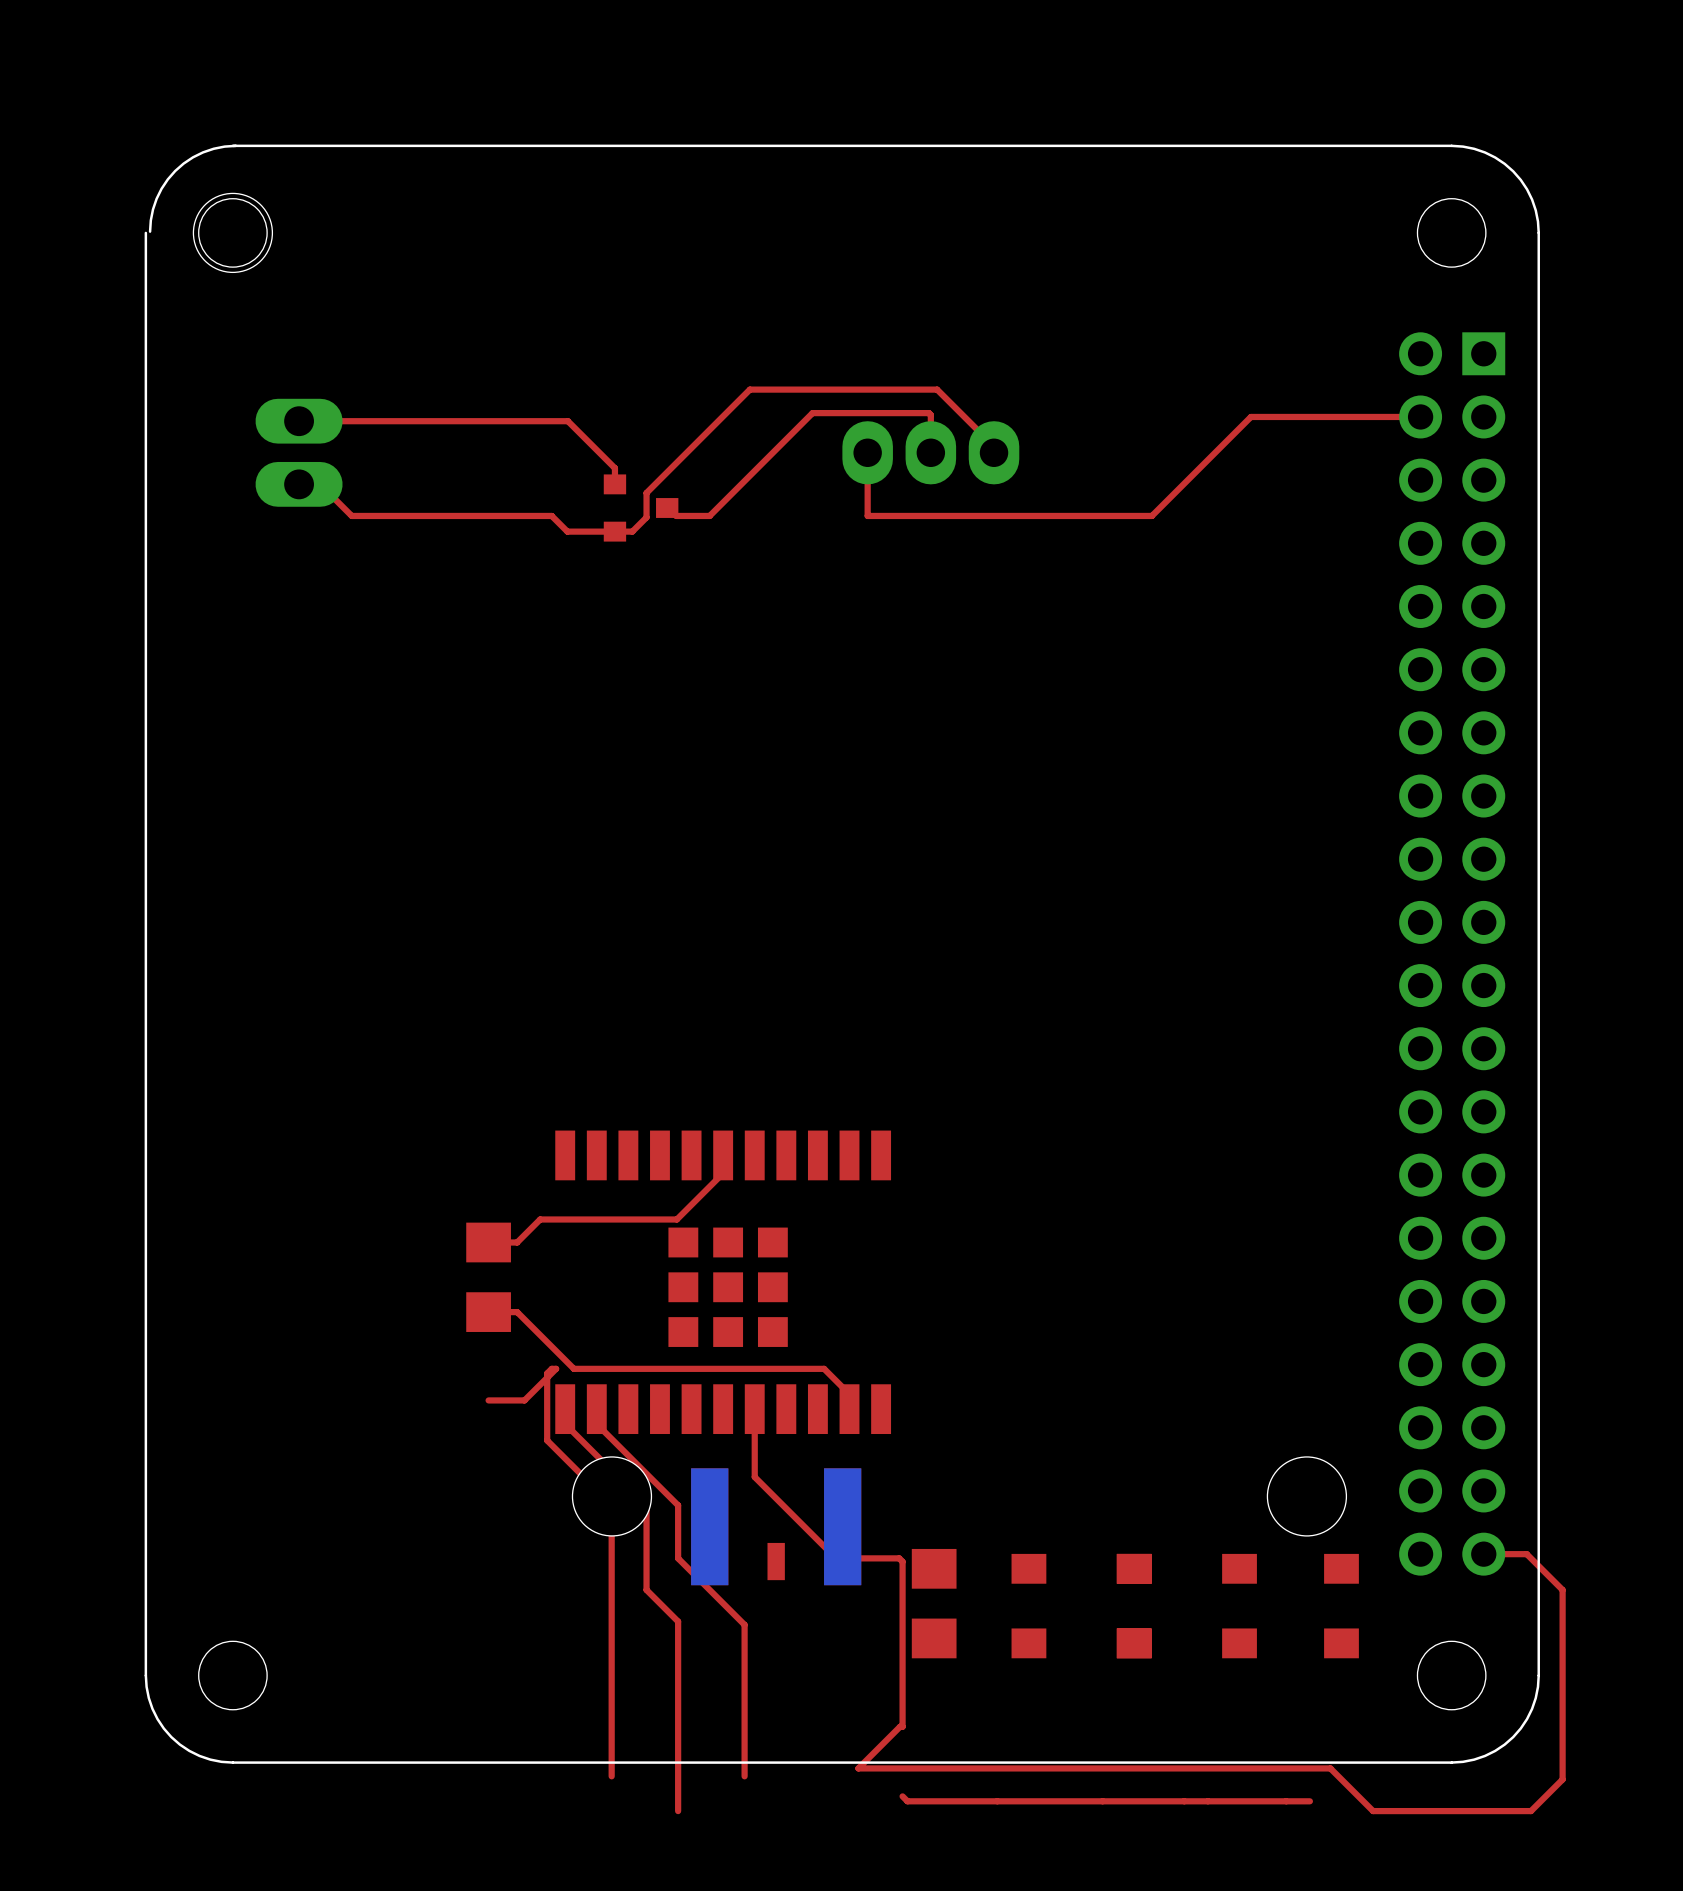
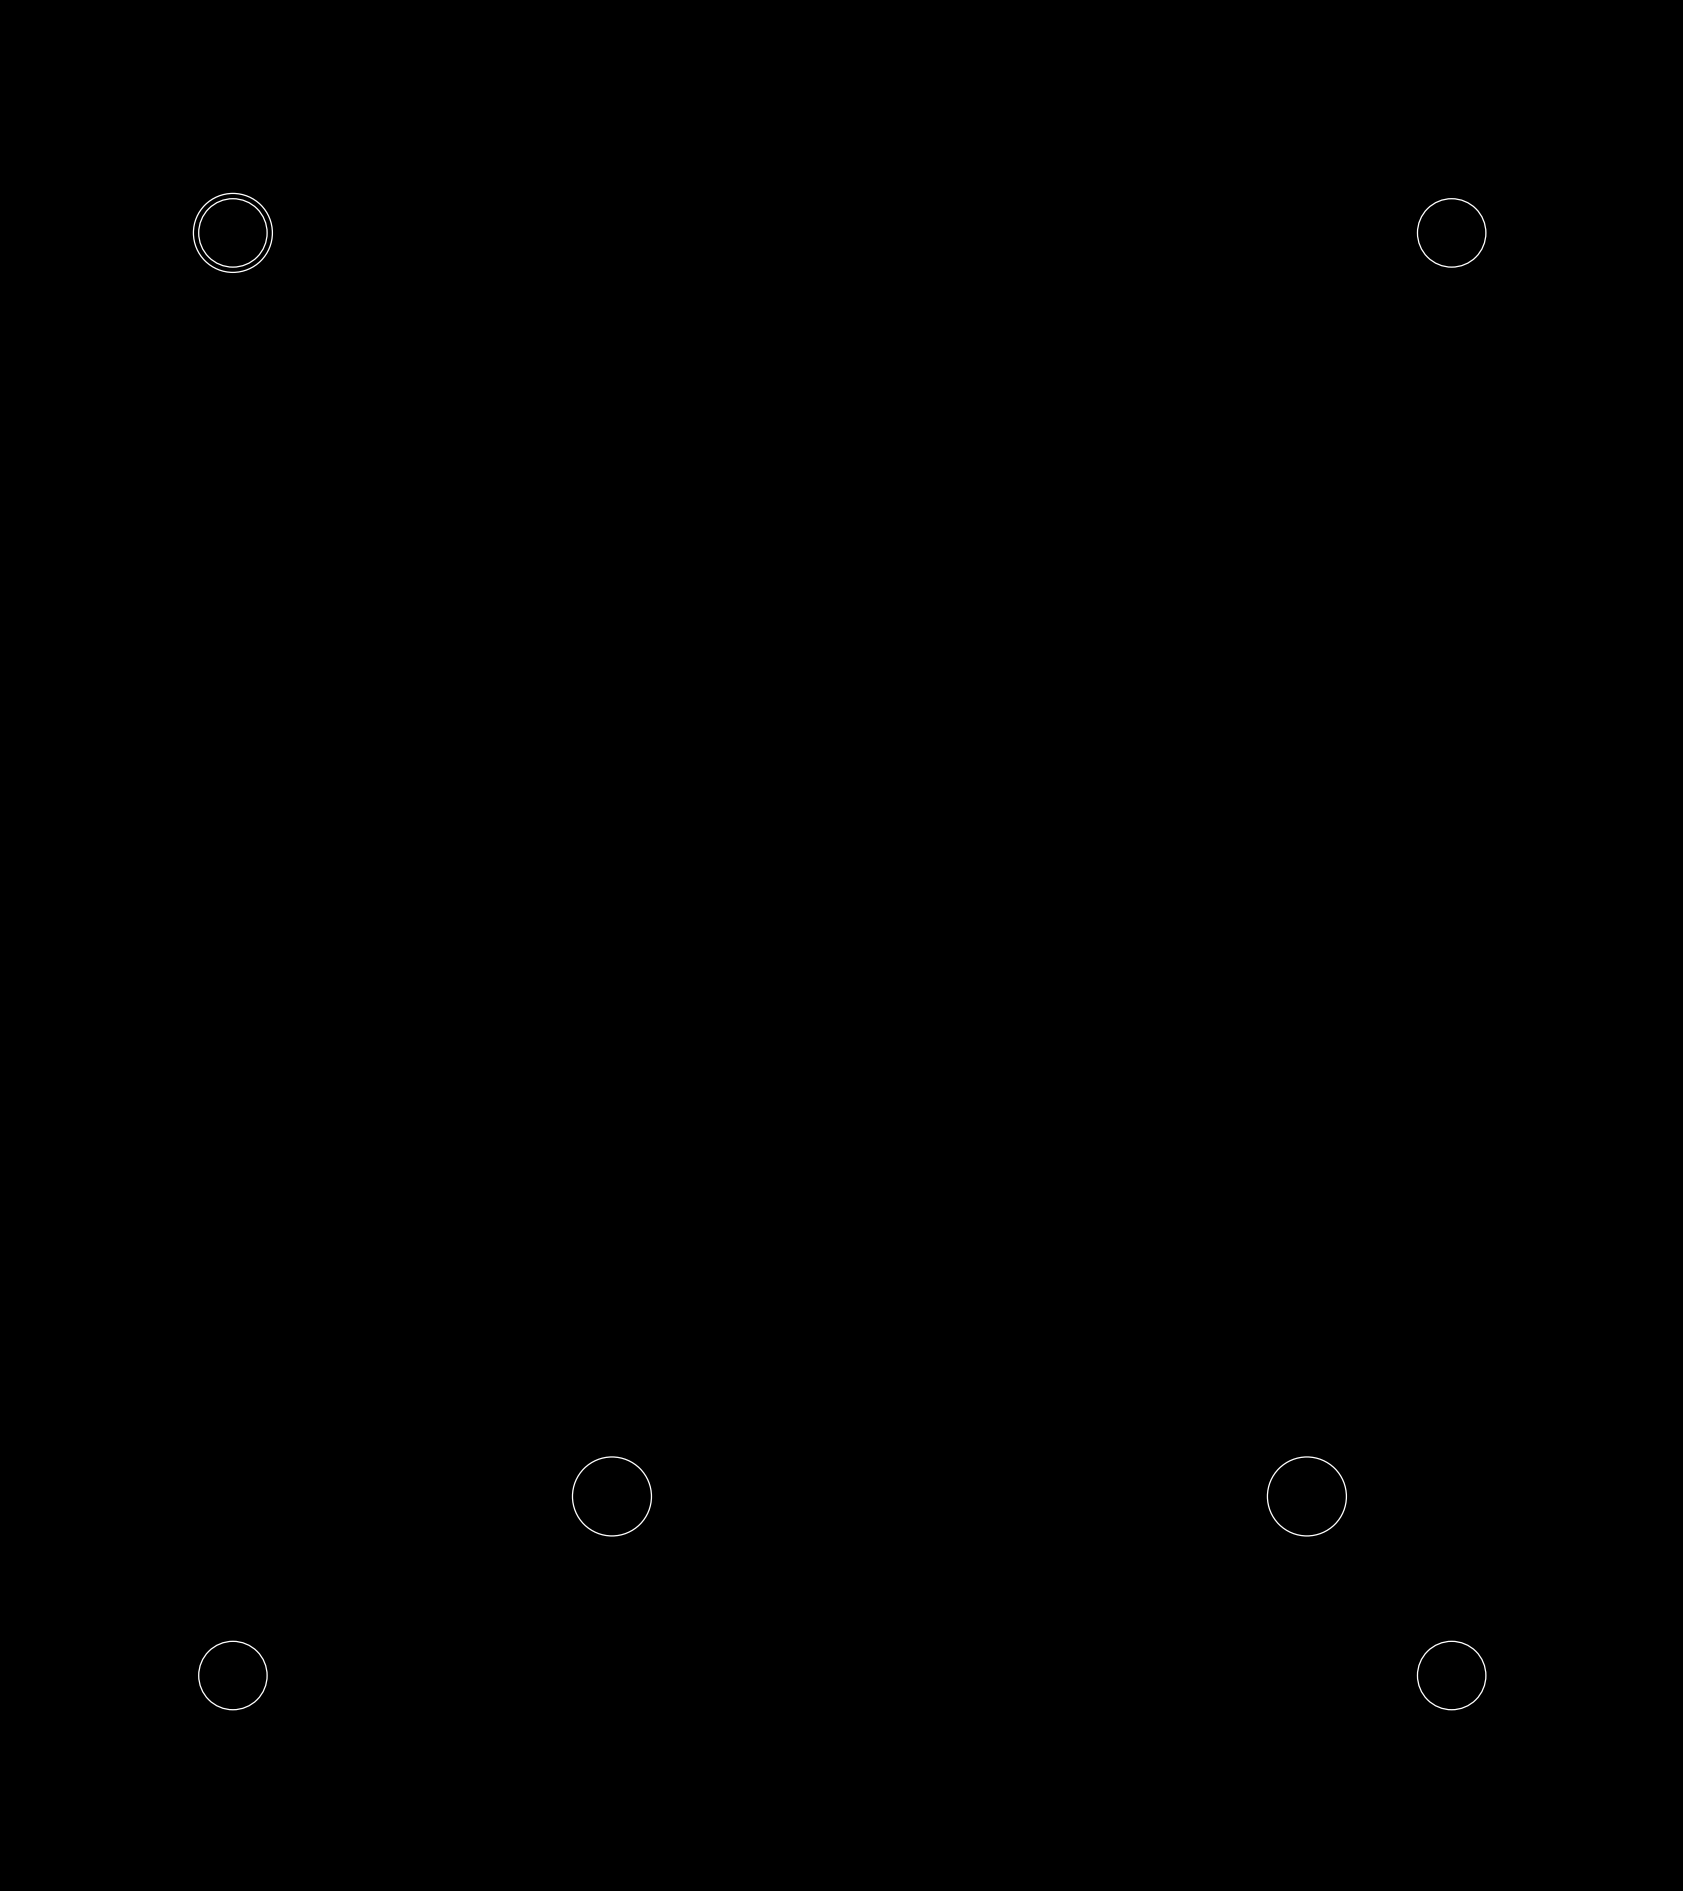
board edge: (232, 145) (1451, 145) (1474, 148) (1495, 157) (1520, 179) (1532, 199) (1538, 232) (1538, 1675) (1532, 1708) (1513, 1737) (1484, 1755) (1451, 1762) (232, 1762) (199, 1755) (171, 1737) (152, 1708) (145, 1675) (145, 232) -> none
board edge: (235, 145) (203, 152) (175, 170) (156, 198) (150, 231) -> none
top track: (1420, 416) (1250, 416) (1151, 515) (867, 515) (867, 452) -> none
top track: (299, 421) (567, 421) (614, 468) (614, 484) -> none
part: (299, 452) -> none
top track: (930, 452) (930, 414) (928, 413) (812, 413) (709, 515) (676, 515) (667, 508) -> none
part: (930, 452) -> none
top track: (994, 452) (994, 446) (937, 389) (749, 389) (646, 492) (646, 517) (632, 531) (567, 531) (551, 515) (351, 515) (320, 484) (299, 484) -> none
part: (641, 508) -> none
part: (1452, 953) -> none
top track: (723, 1155) (723, 1173) (676, 1219) (540, 1219) (517, 1242) (488, 1242) -> none
part: (488, 1277) -> none
part: (723, 1282) -> none
top track: (488, 1312) (517, 1312) (573, 1368) (824, 1368) (849, 1394) (849, 1409) -> none
top track: (488, 1400) (524, 1400) (556, 1368) (551, 1368) (547, 1373) (547, 1440) (598, 1491) (611, 1491) (611, 1776) -> none
top track: (565, 1409) (565, 1424) (646, 1505) (646, 1589) (678, 1621) (678, 1811) -> none
top track: (596, 1409) (596, 1424) (678, 1505) (678, 1558) (744, 1624) (744, 1776) -> none
top track: (754, 1409) (754, 1477) (836, 1558) (899, 1558) (902, 1561) (902, 1726) (900, 1726) (858, 1768) (1330, 1768) (1373, 1811) (1531, 1811) (1562, 1779) (1562, 1589) (1526, 1554) (1483, 1554) -> none
part: (776, 1526) -> none
part: (934, 1603) -> none
part: (1028, 1606) -> none
part: (1134, 1606) -> none
part: (1239, 1606) -> none
part: (1341, 1606) -> none
top track: (902, 1796) (907, 1801) (1309, 1801) -> none

